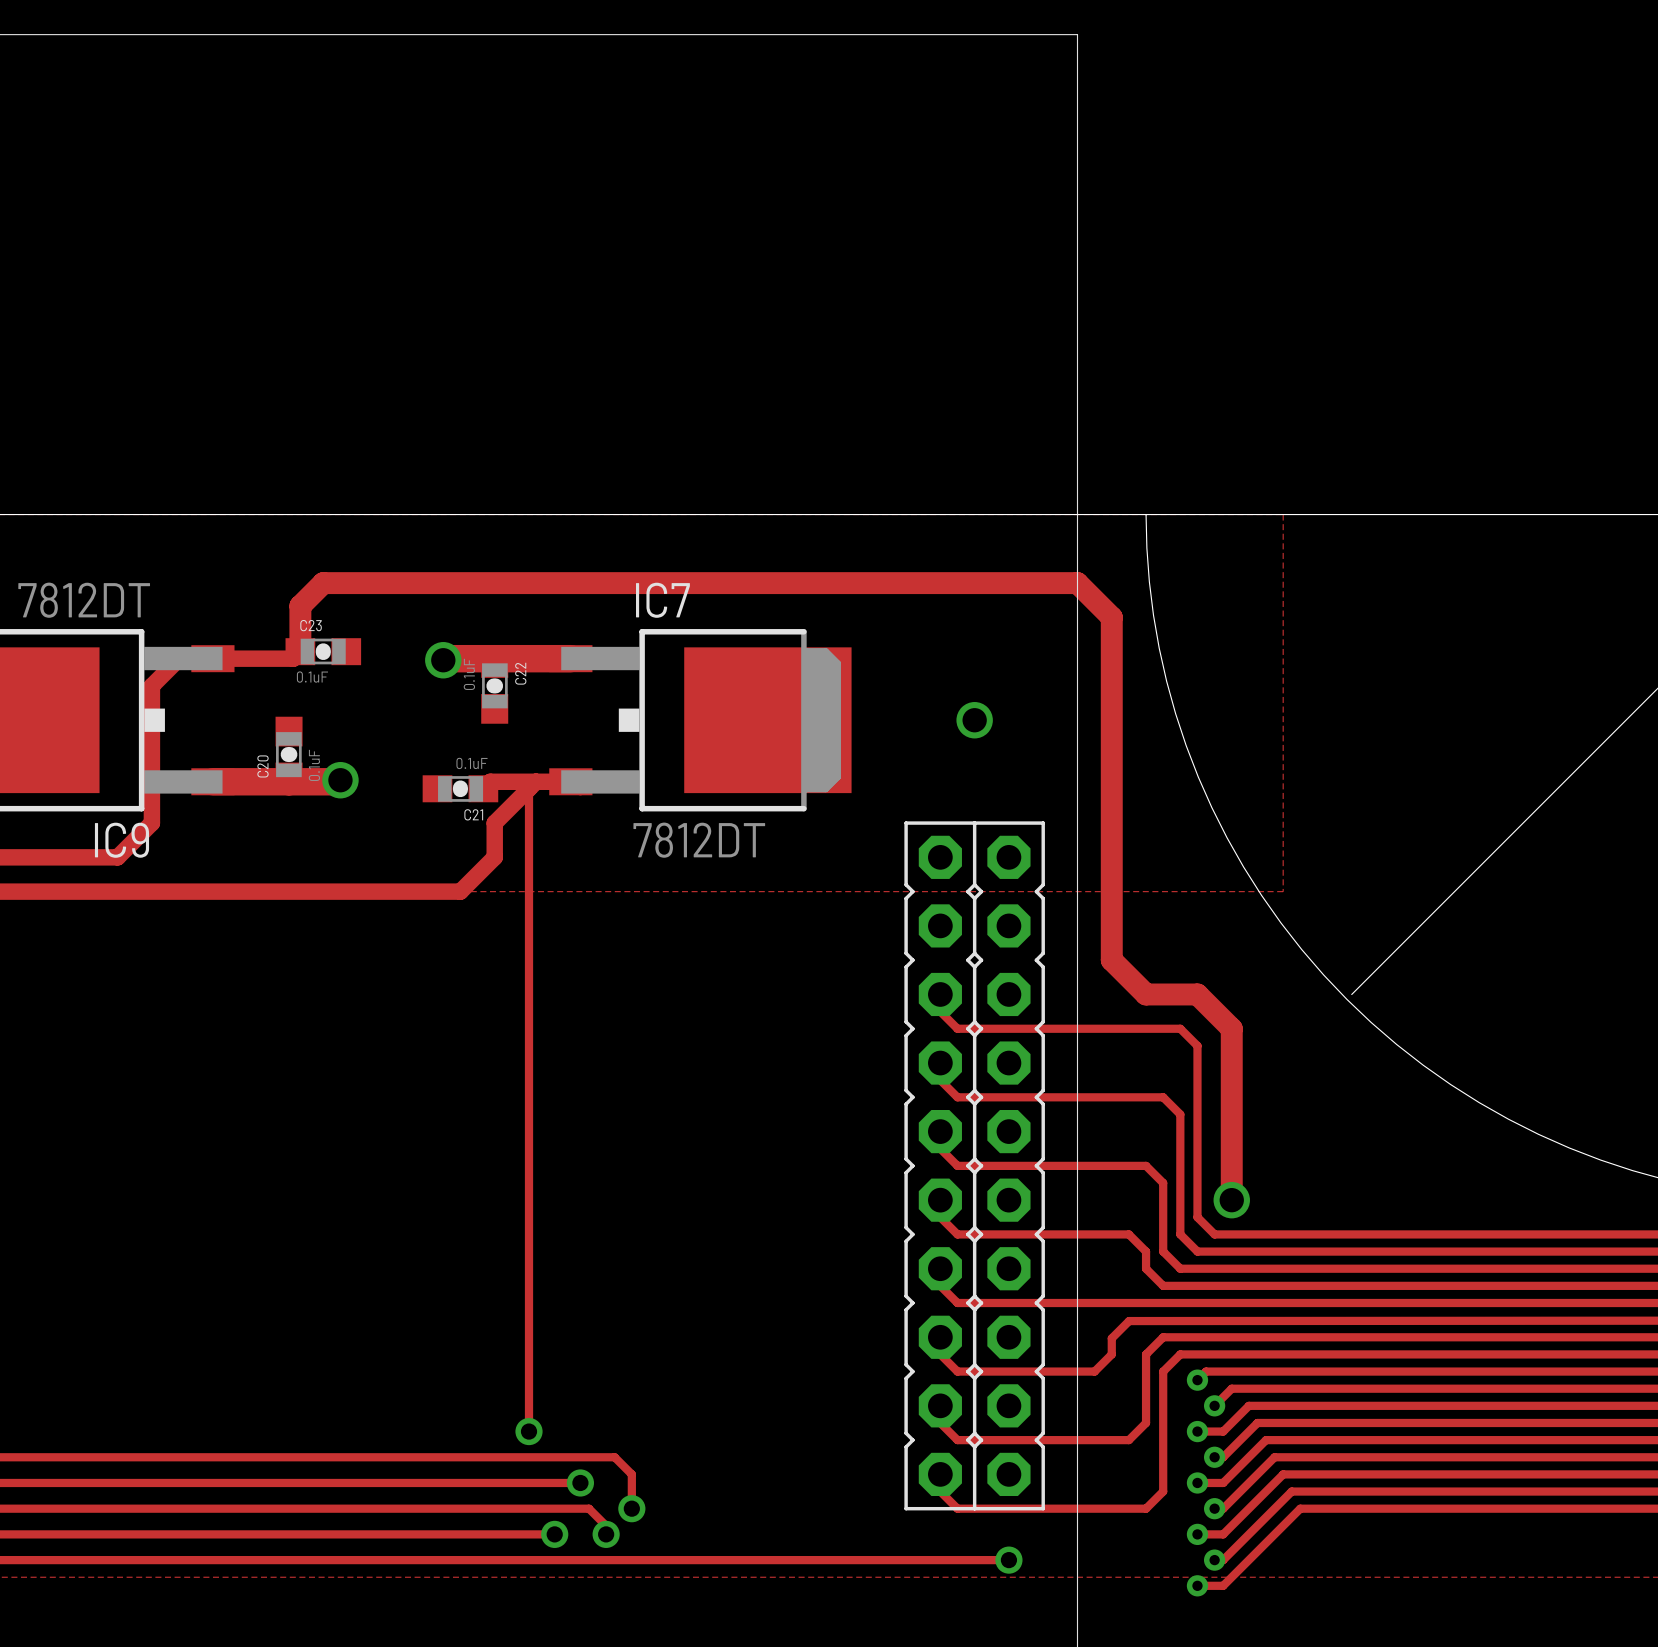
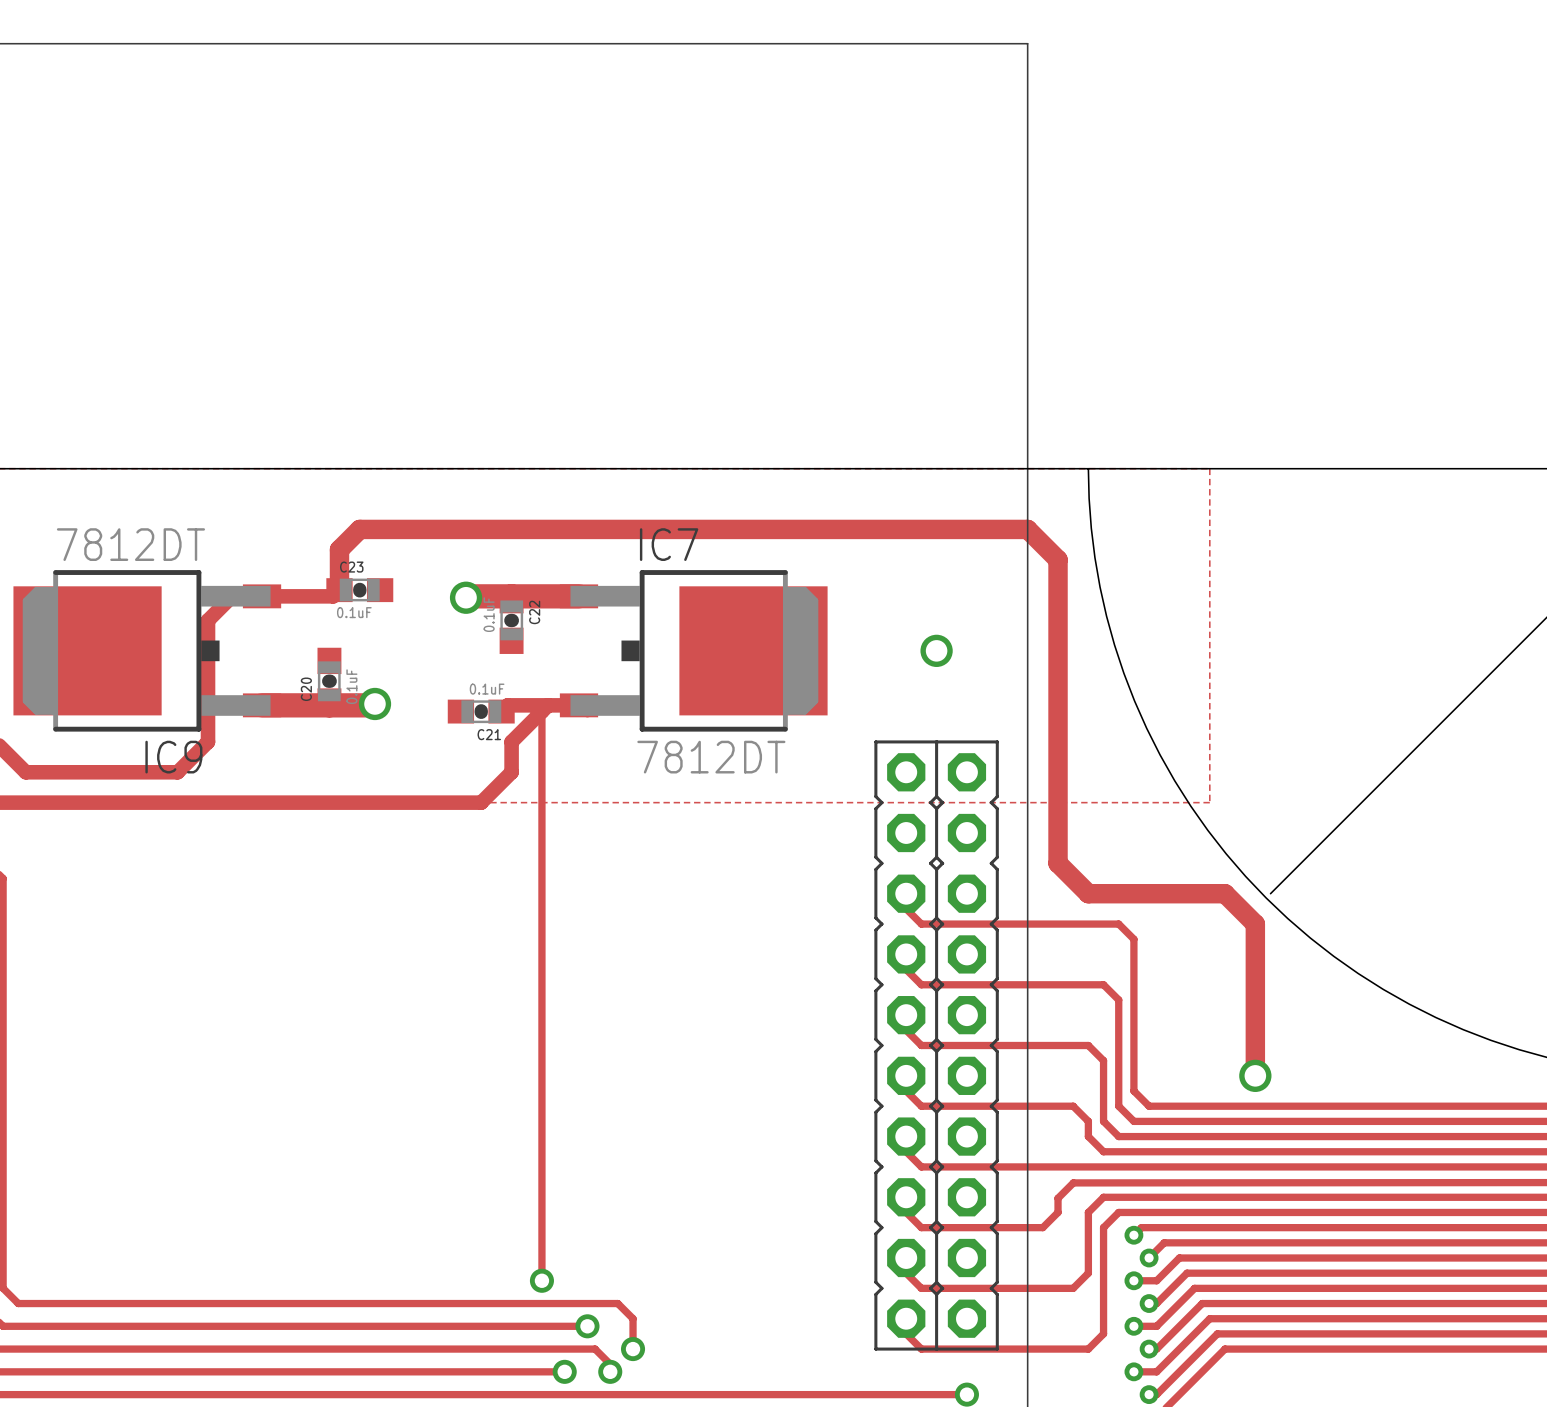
track: (1197, 994) (1231, 1028) (1231, 1200) -> (1133, 893) (1224, 893) (1255, 924) (1255, 1075)
via position: (1231, 1200) -> (1255, 1075)

